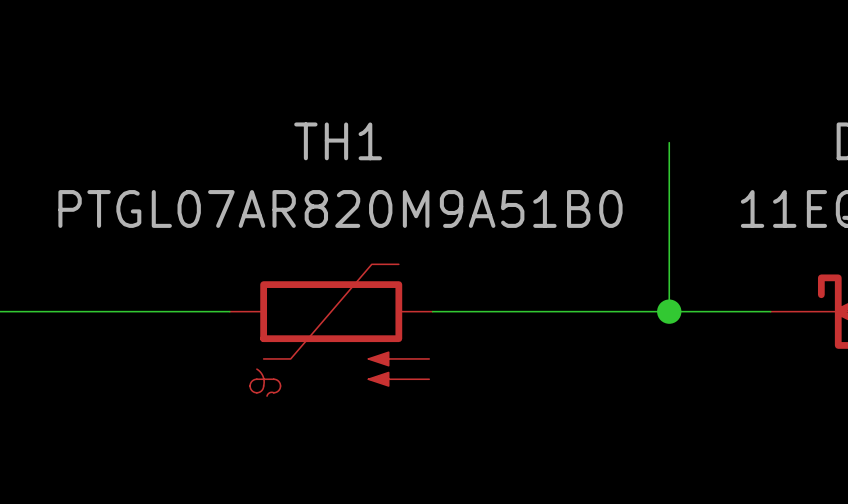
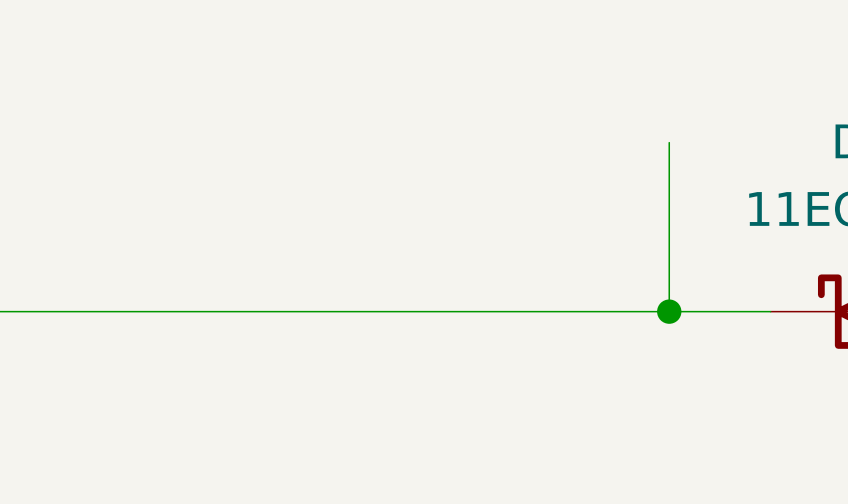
wire: none -> (229, 311) (432, 311)
TH1: PTGL07AR820M9A51B0 (331, 330) -> none

